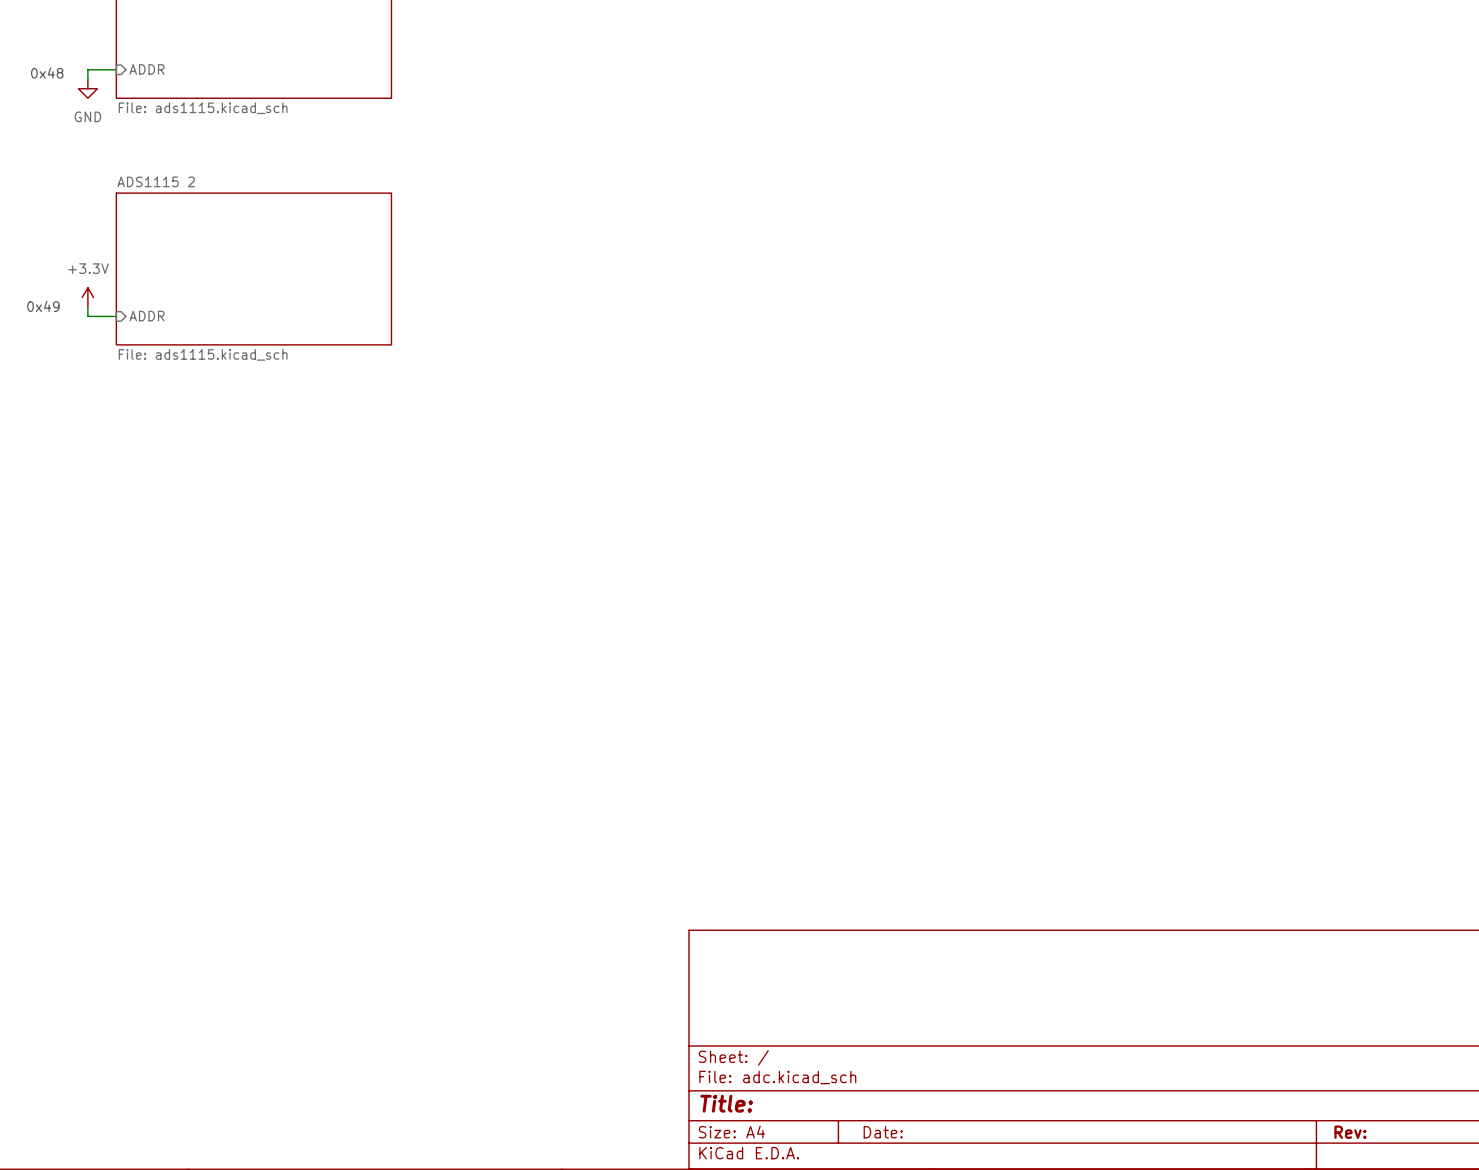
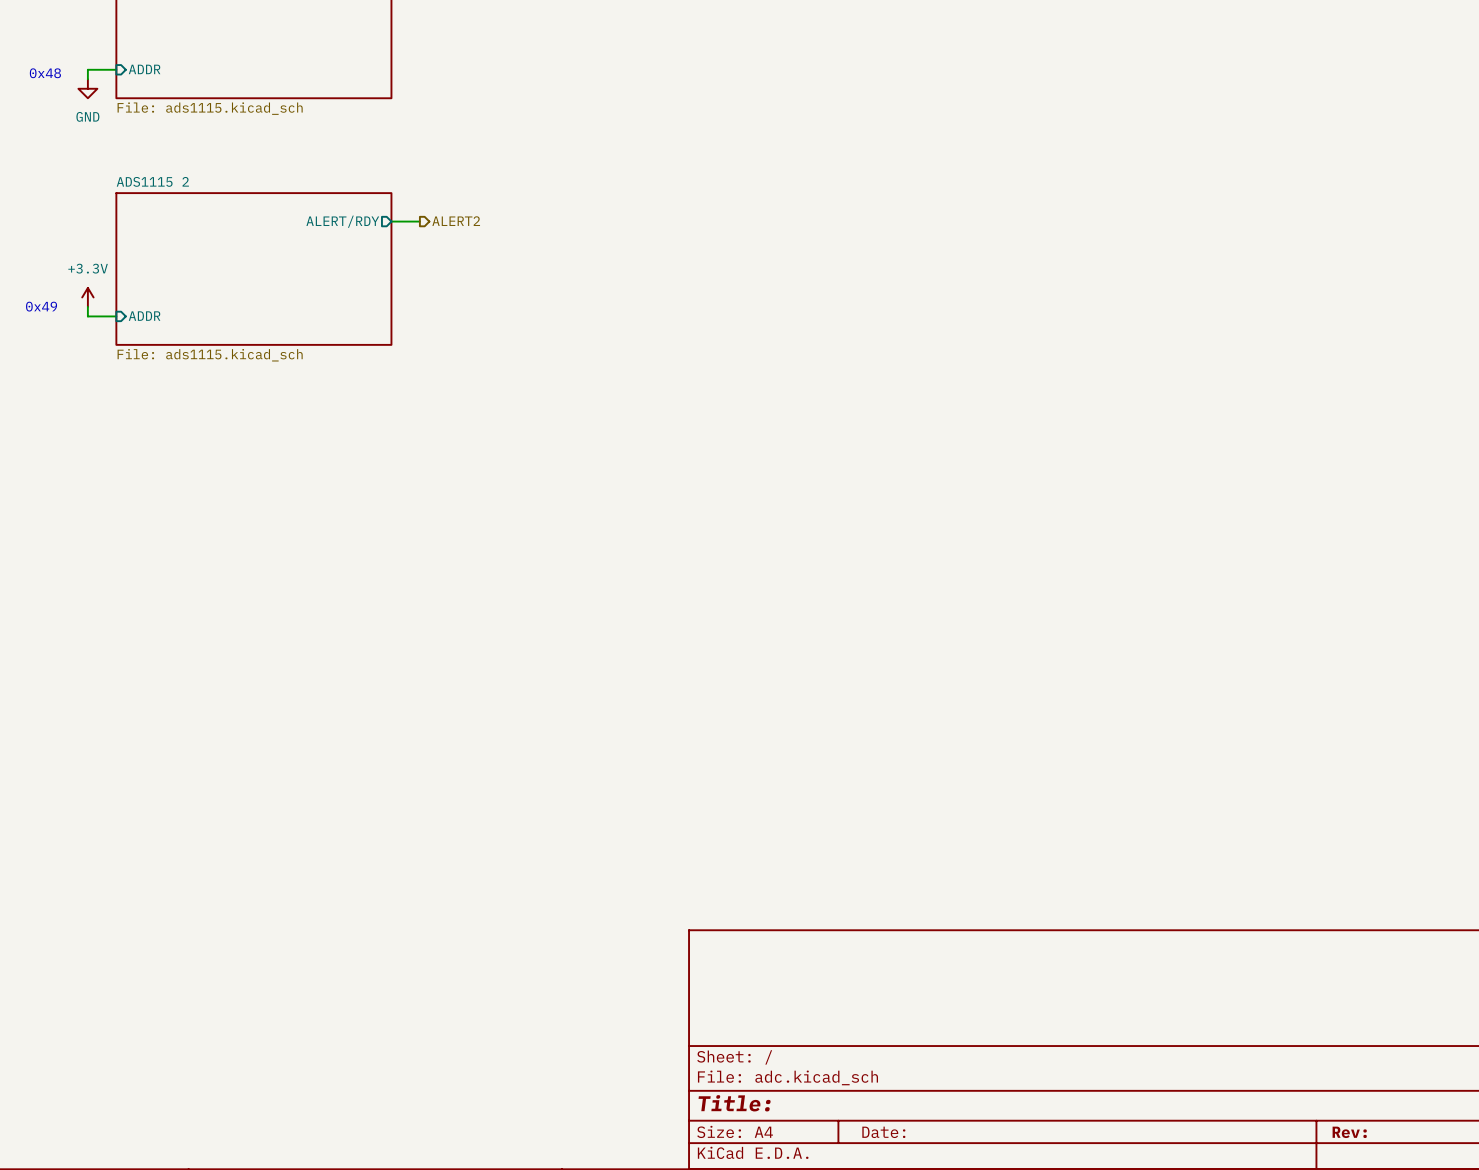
wire: none -> (391, 221) (419, 221)
hierarchical label: none -> ALERT2 (456, 221)
sheet pin: none -> ALERT/RDY (342, 221)

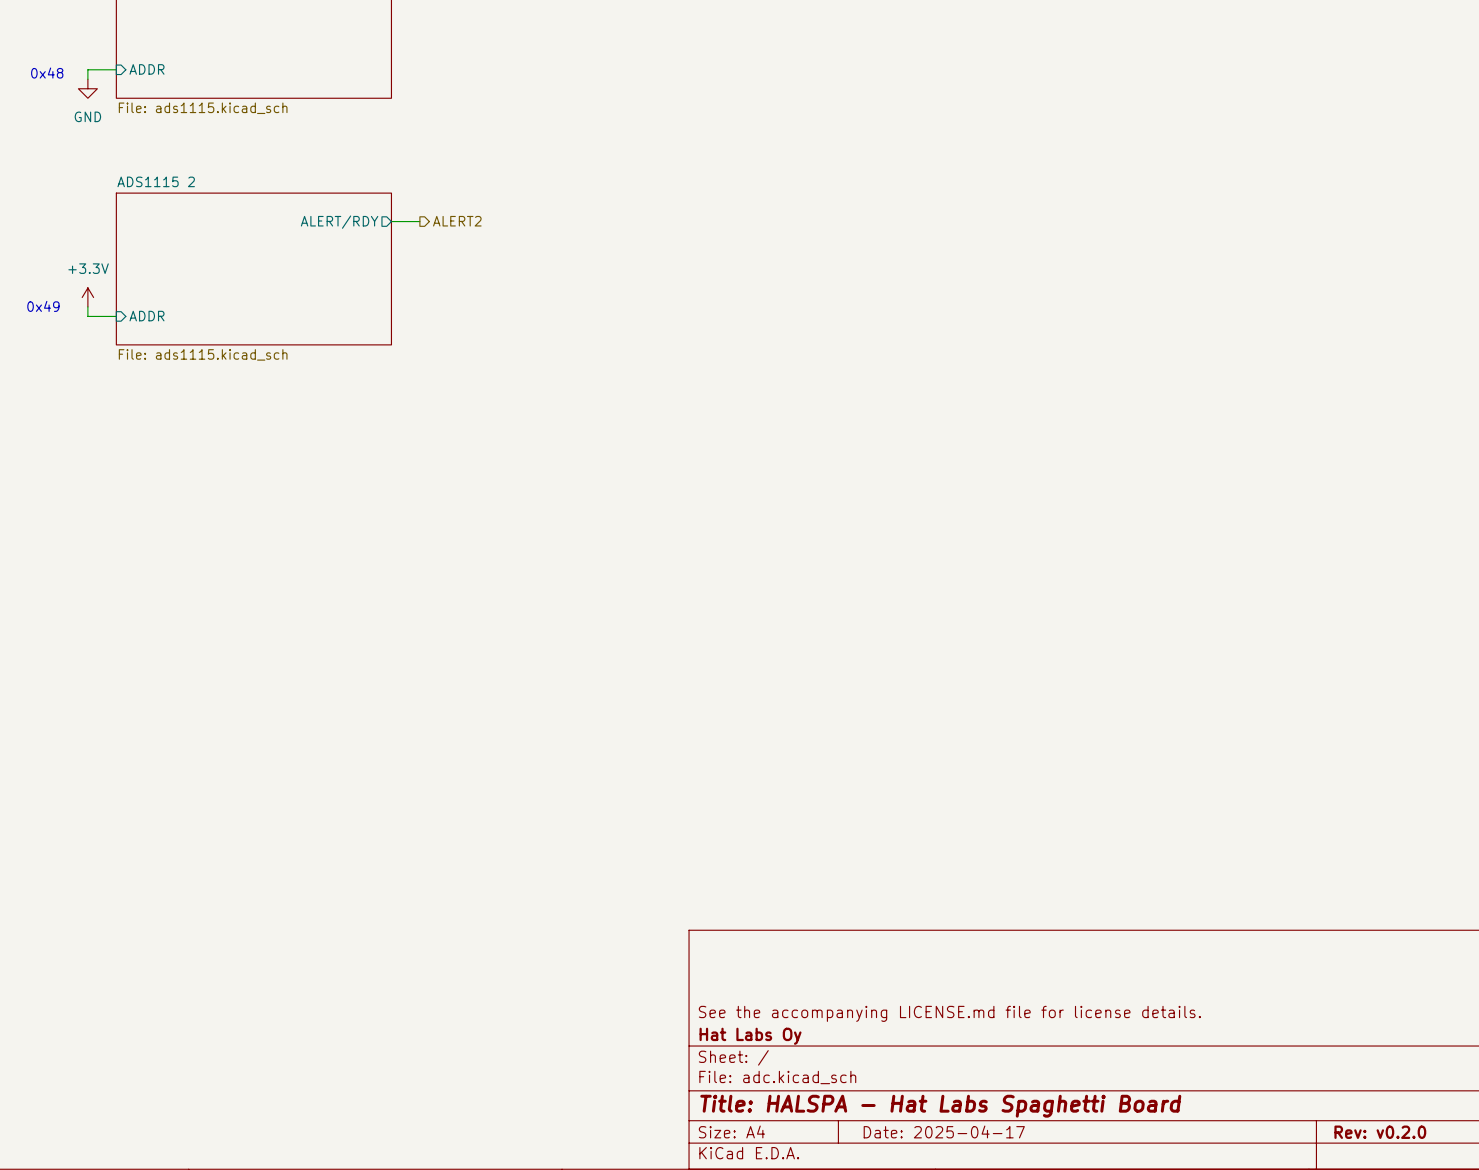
title block: none -> See the accompanying LICENSE.md file for license details. (949, 1013)
title block: none -> Hat Labs Oy (750, 1036)
title block: Title: (734, 1103) -> Title: HALSPA - Hat Labs Spaghetti Board (940, 1106)
title block: Date: (883, 1132) -> Date: 2025-04-17 (944, 1131)
title block: Rev: (1349, 1132) -> Rev: v0.2.0 (1380, 1132)

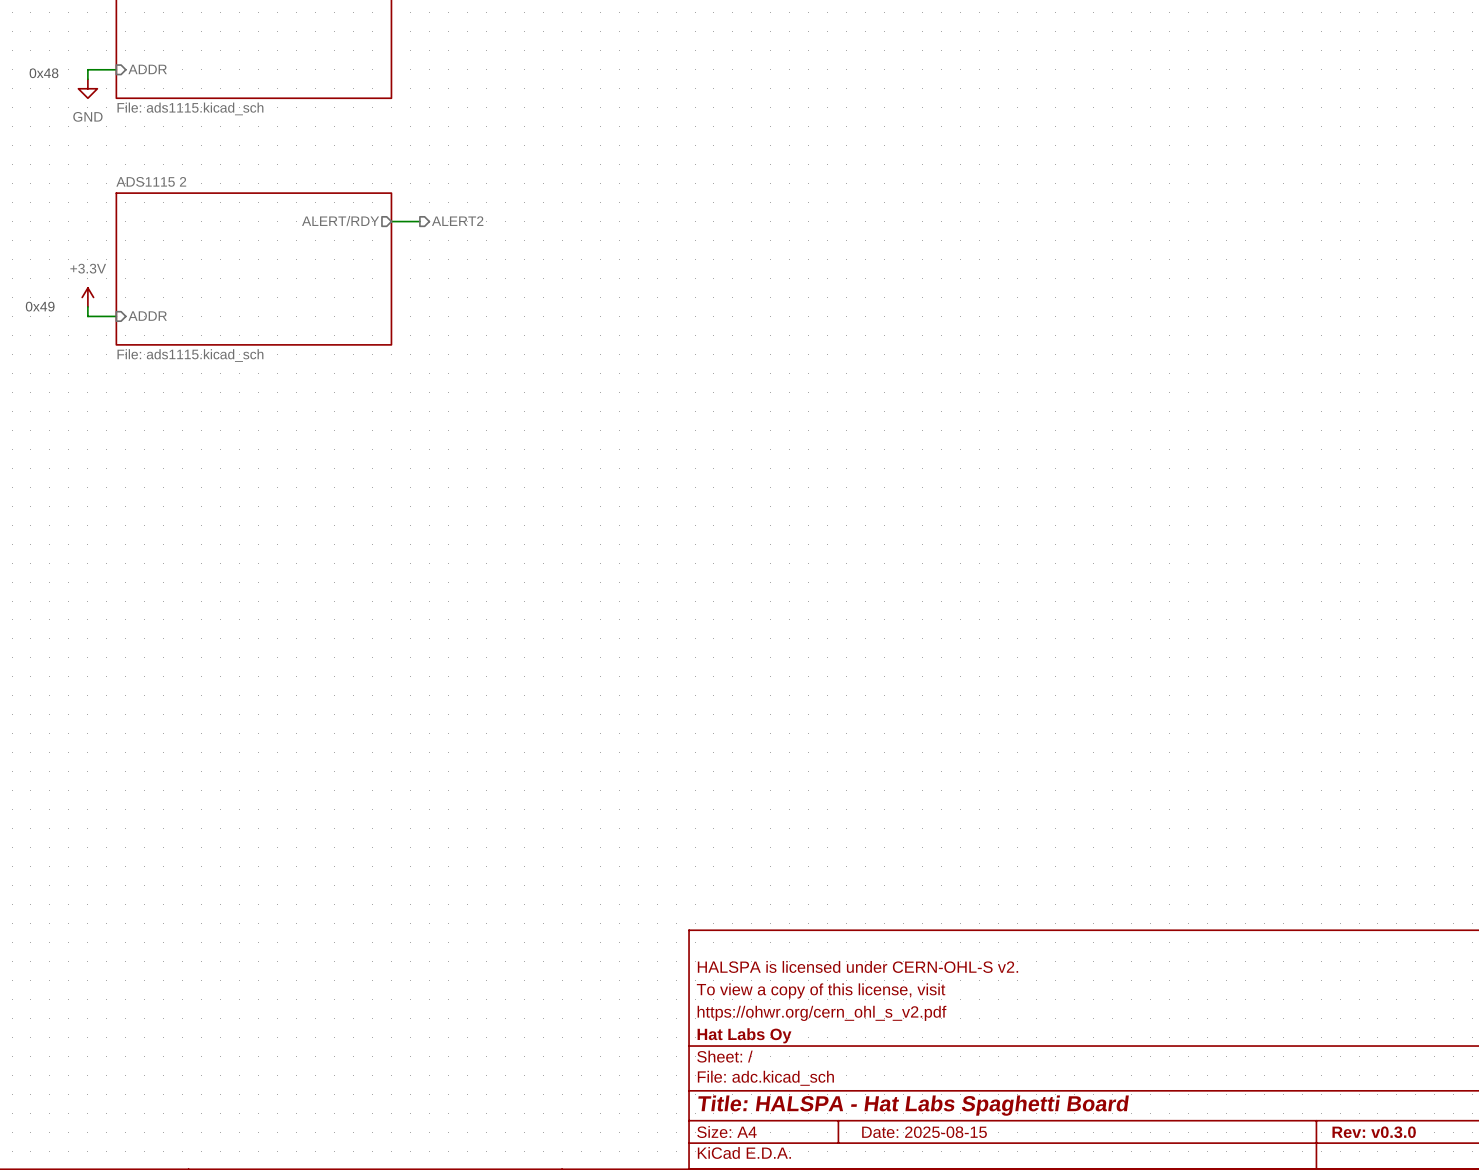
title block: none -> HALSPA is licensed under CERN-OHL-S v2. (857, 966)
title block: none -> To view a copy of this license, visit (821, 990)
title block: See the accompanying LICENSE.md file for license details. (949, 1013) -> https://ohwr.org/cern_ohl_s_v2.pdf (822, 1013)
title block: Date: 2025-04-17 (944, 1131) -> Date: 2025-08-15 (924, 1132)
title block: Rev: v0.2.0 (1380, 1132) -> Rev: v0.3.0 (1374, 1132)

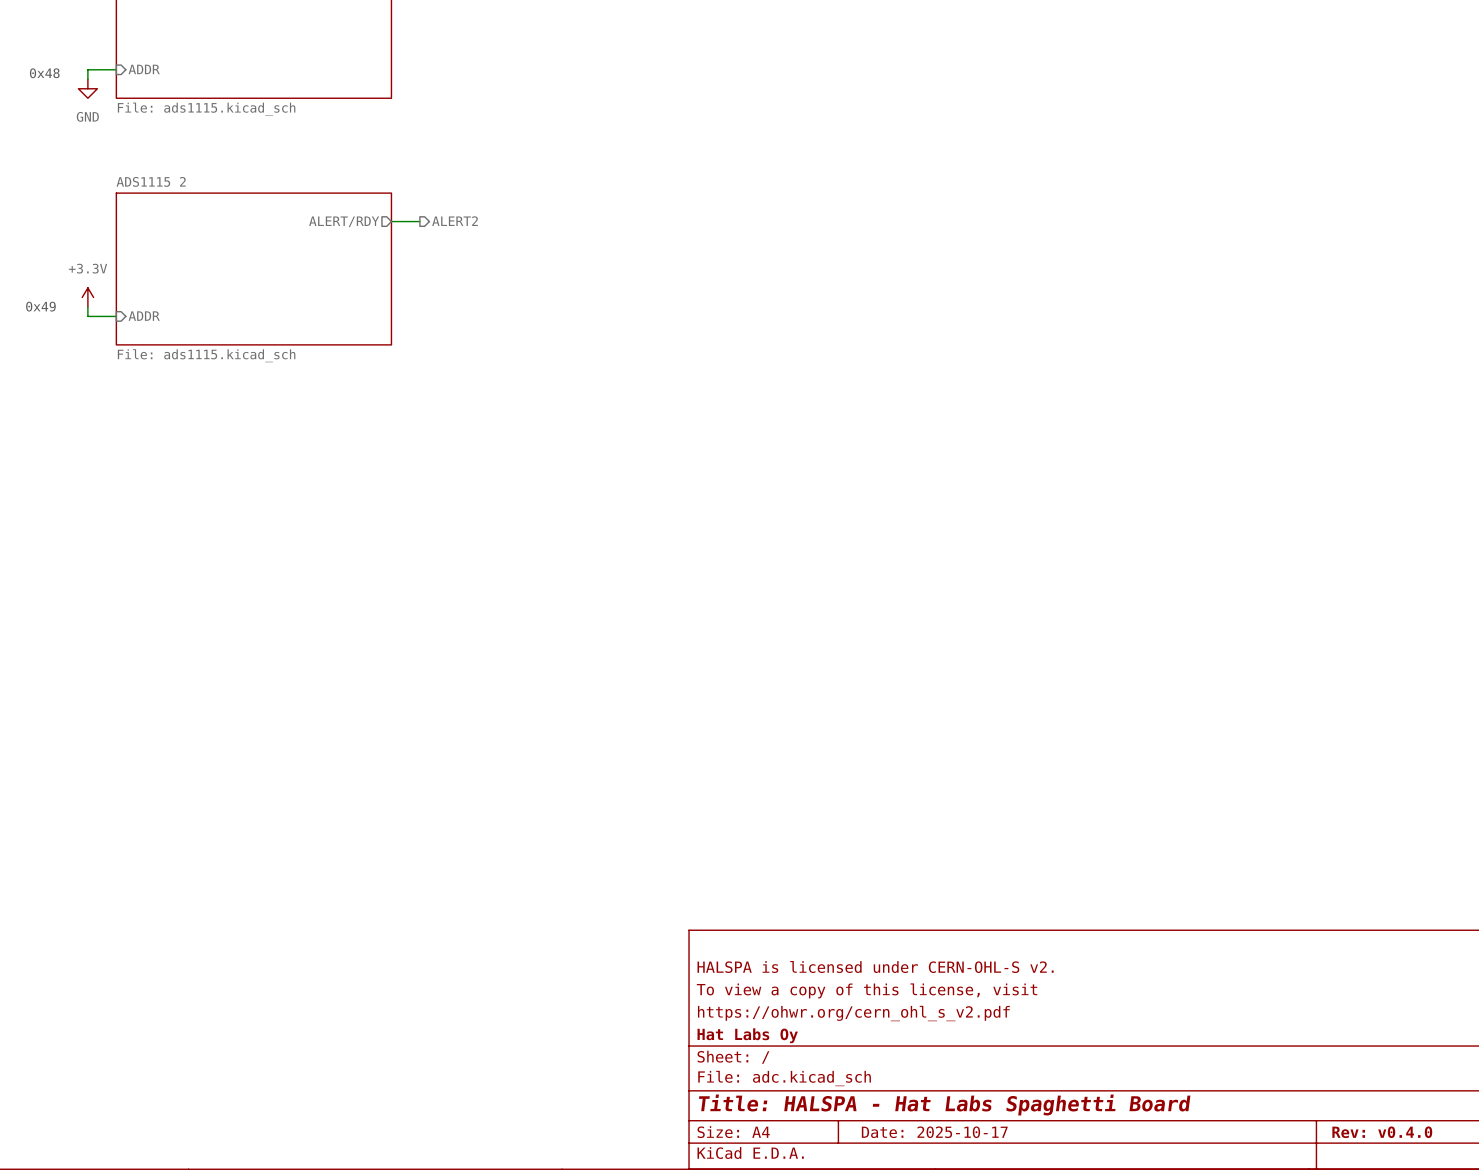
title block: Date: 2025-08-15 (924, 1132) -> Date: 2025-10-17 (934, 1132)
title block: Rev: v0.3.0 (1374, 1132) -> Rev: v0.4.0 (1382, 1132)

